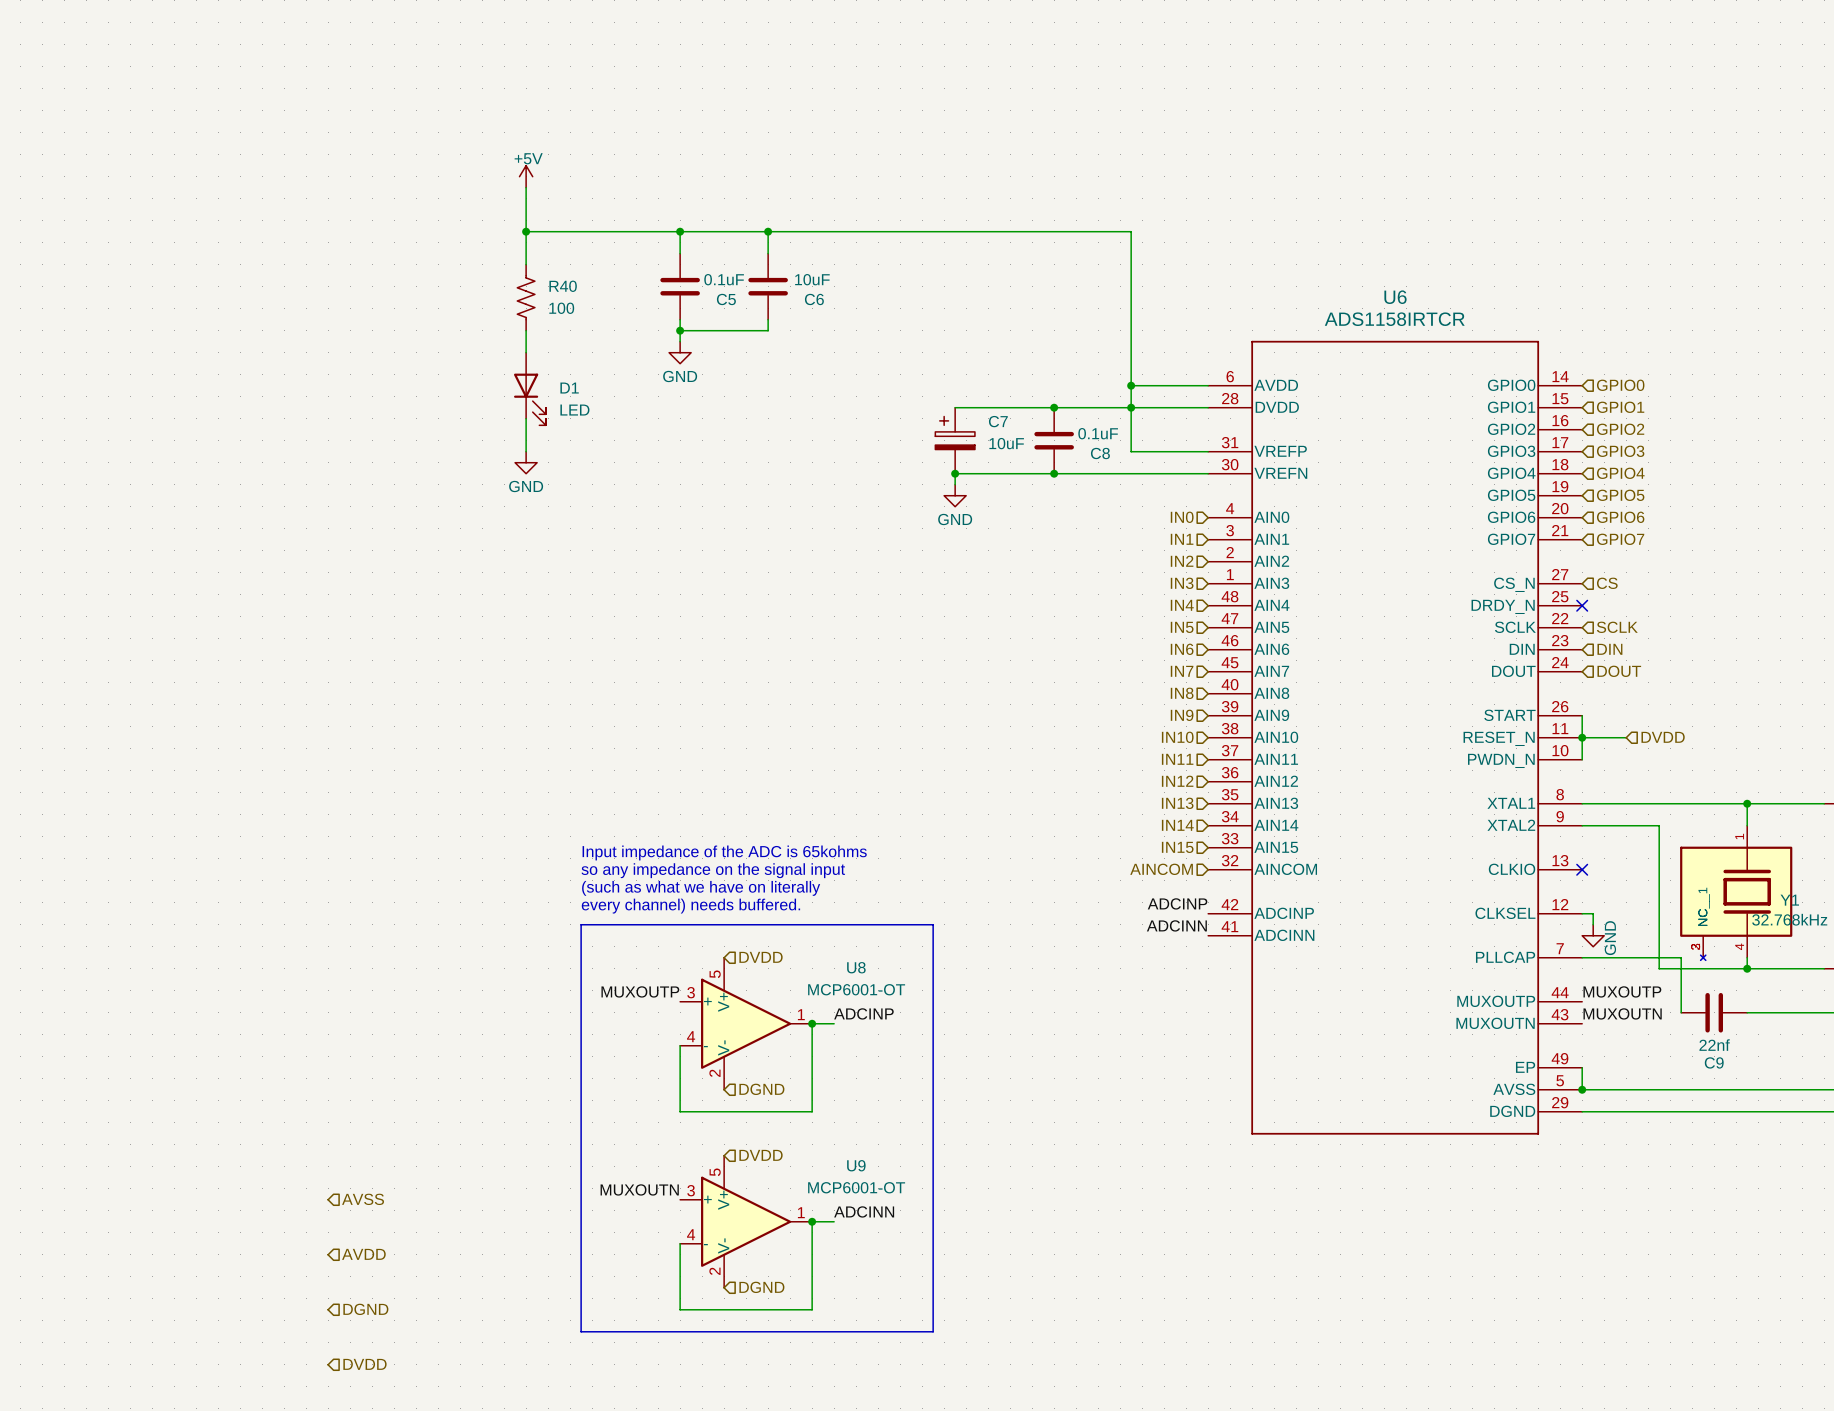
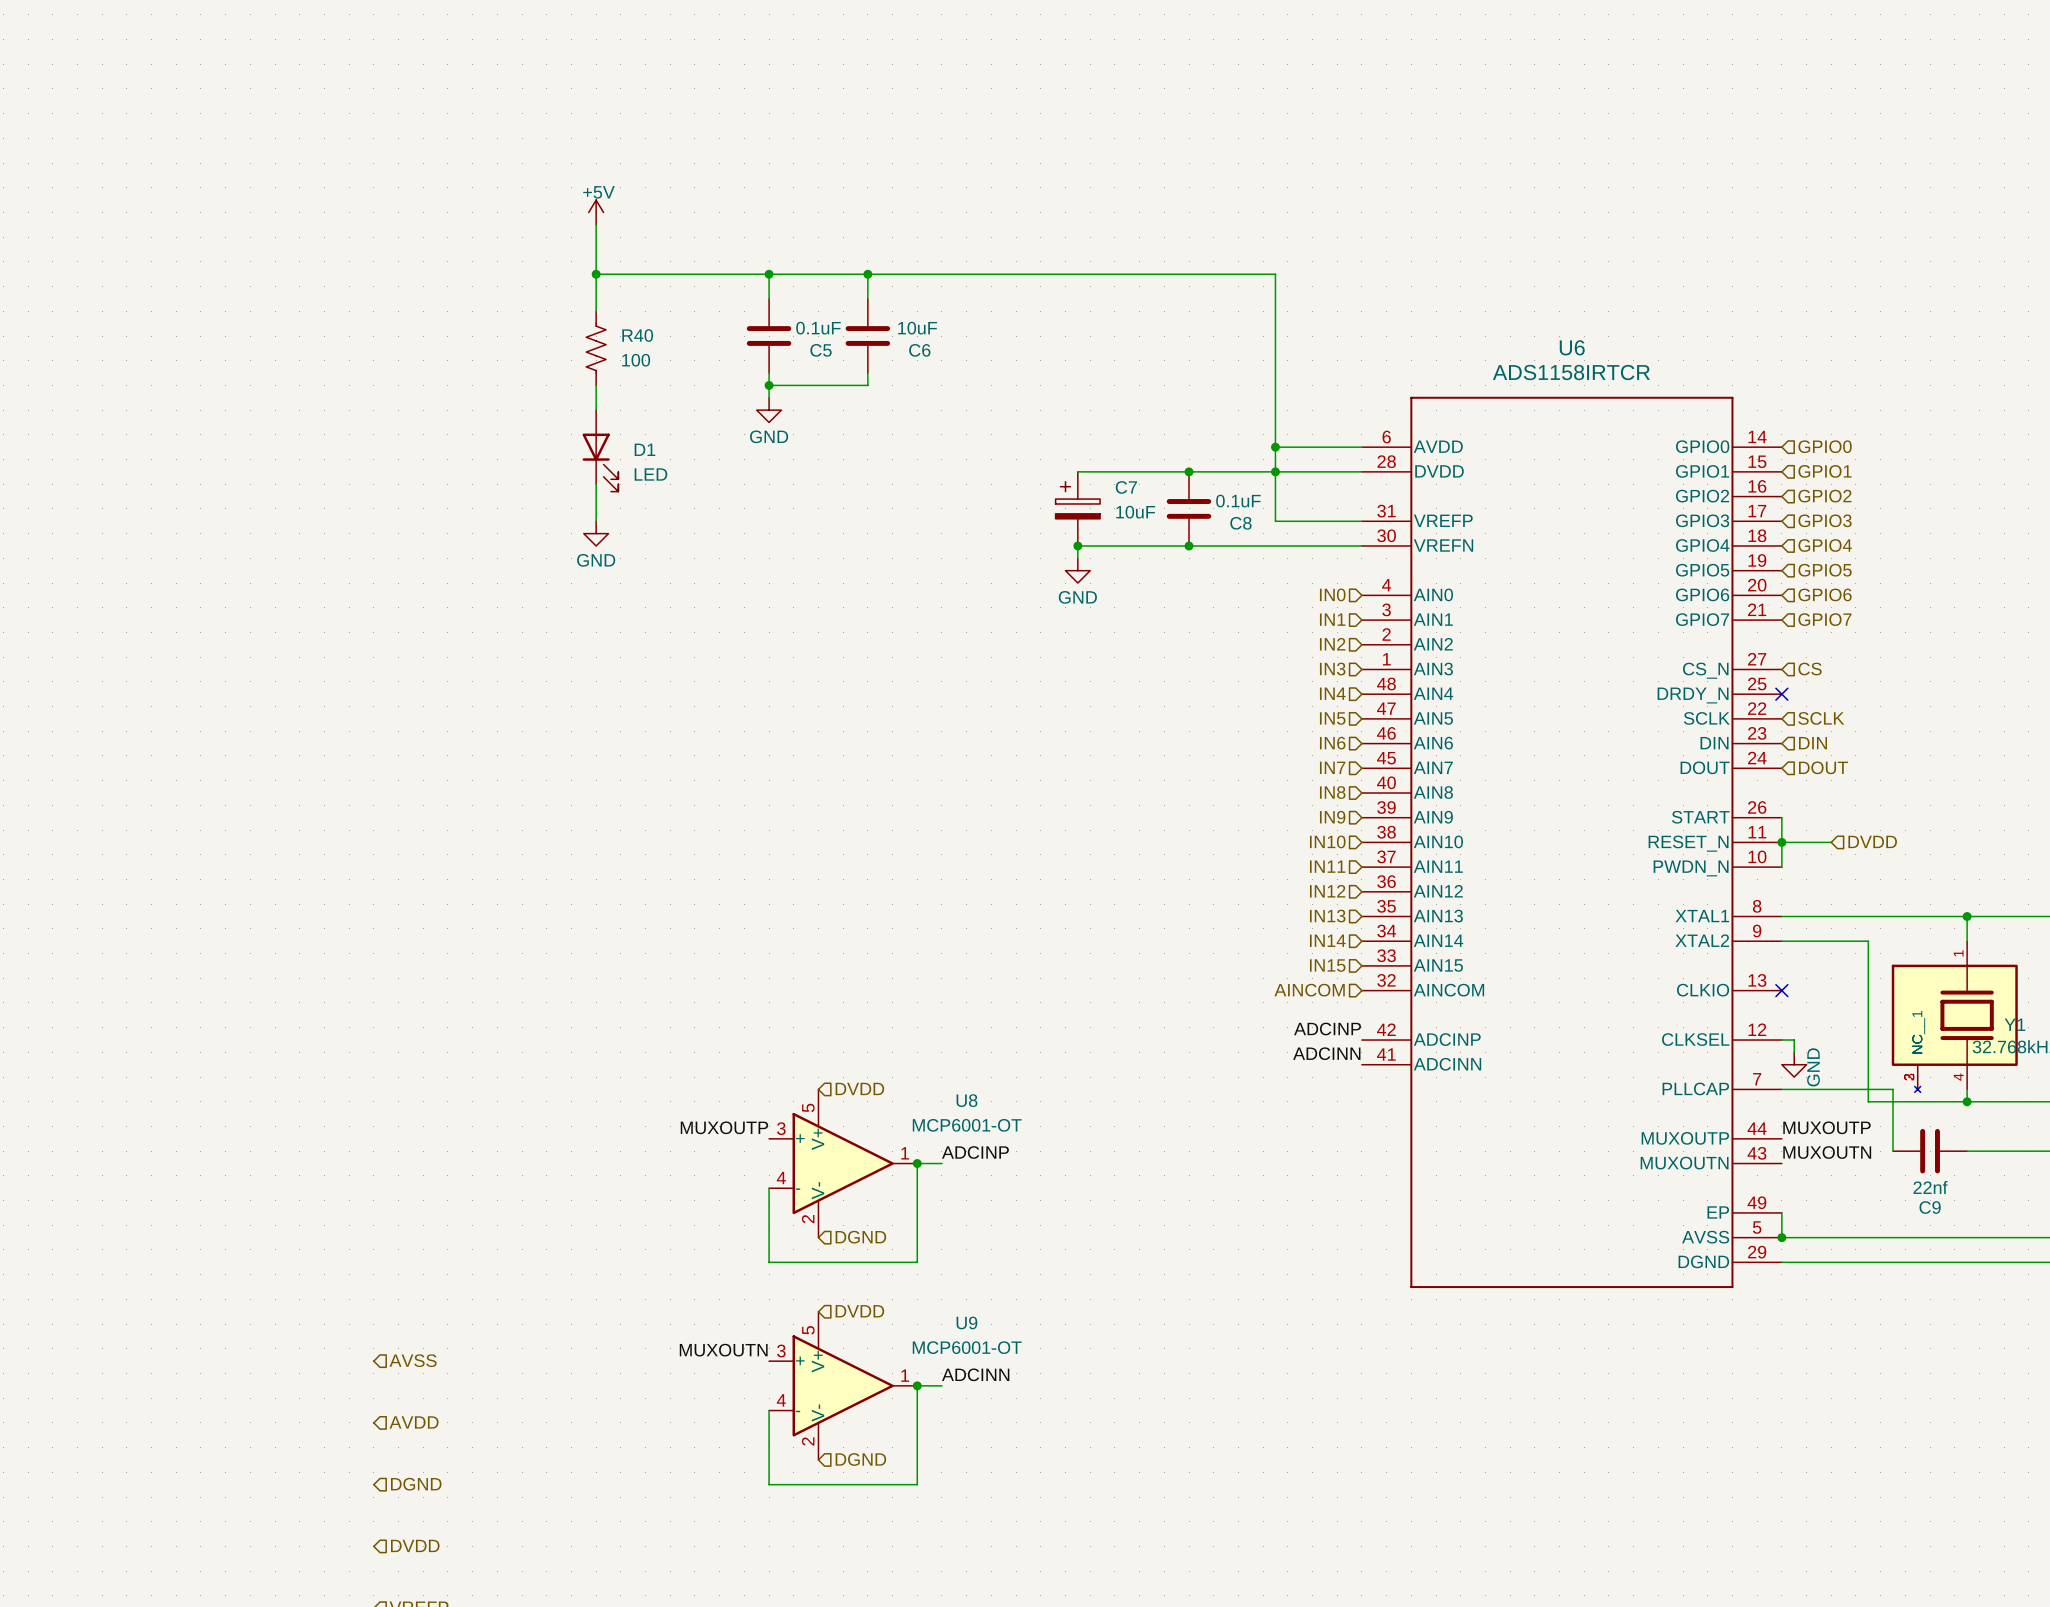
text: Input impedance of the ADC is 65kohms (724, 852) -> none
text: so any impedance on the signal input (713, 870) -> none
text: (such as what we have on literally (701, 888) -> none
text: every channel) needs buffered. (690, 906) -> none
line: (581, 924) (933, 924) (933, 1331) (581, 1331) (581, 924) -> none

